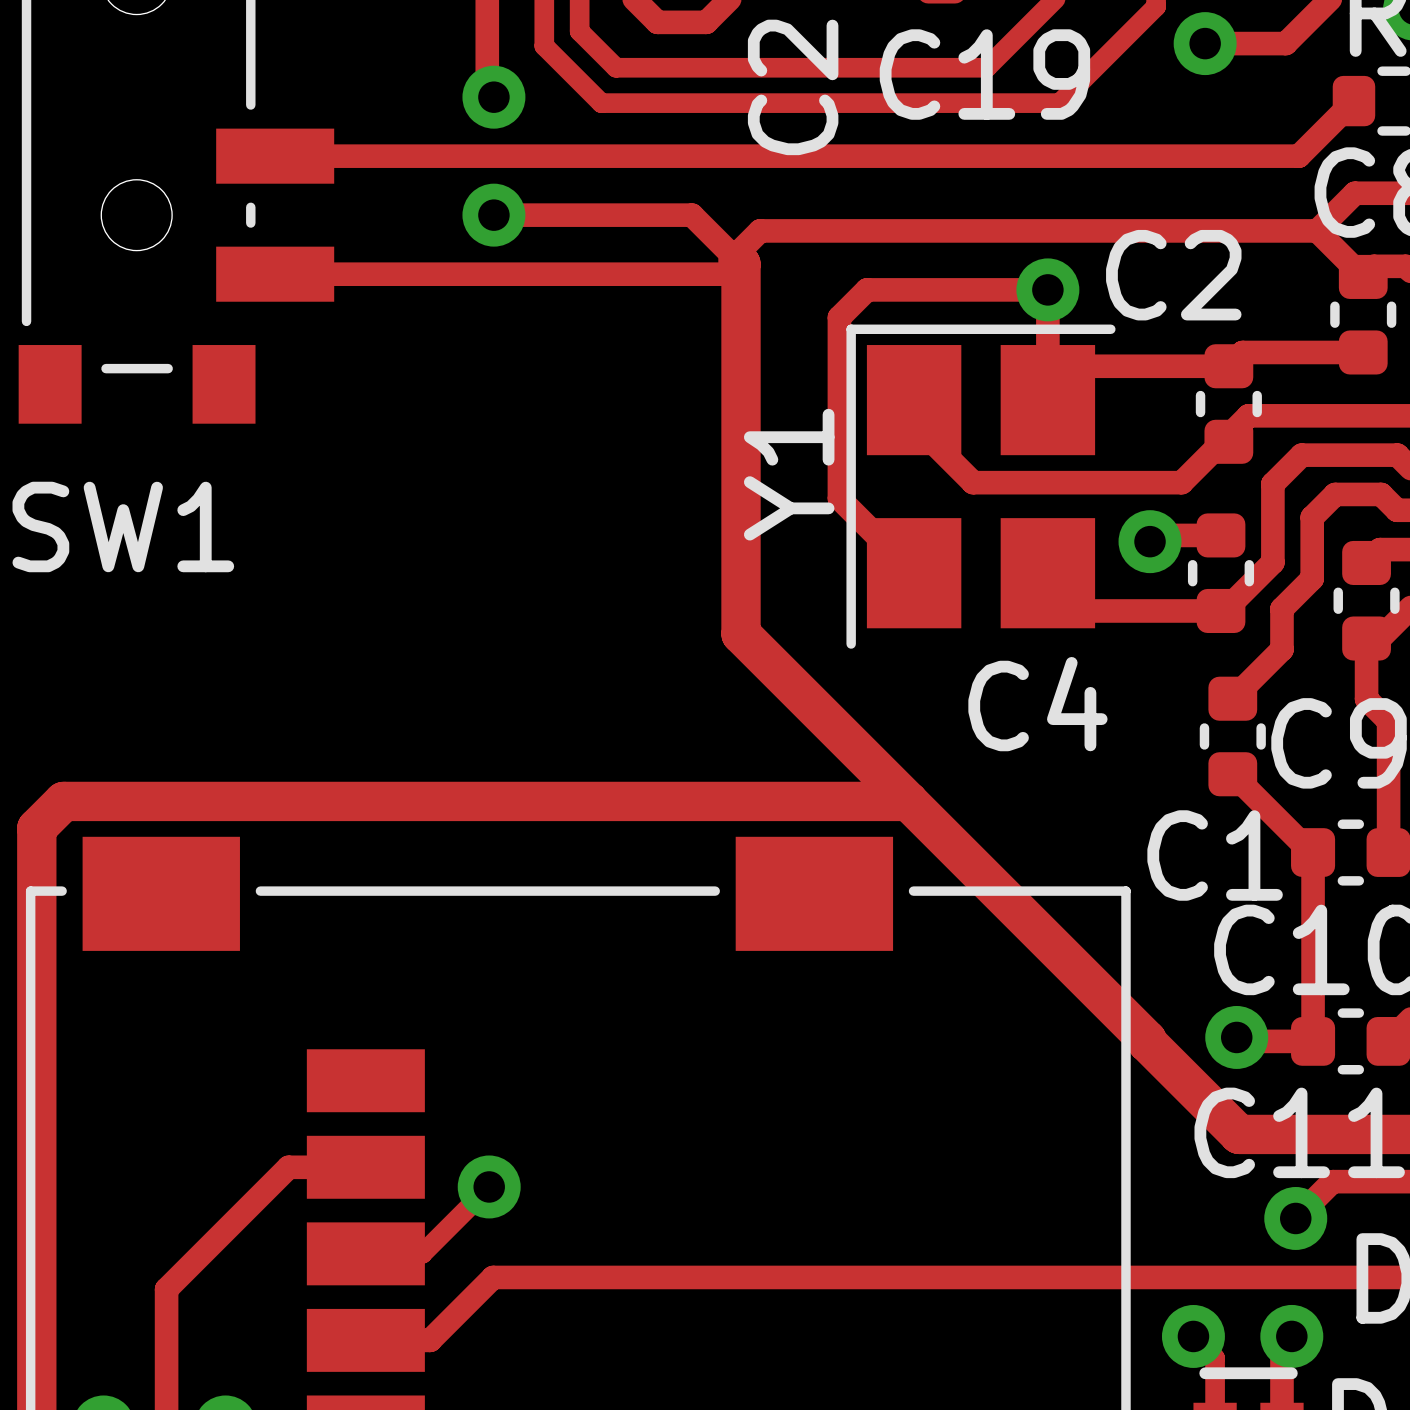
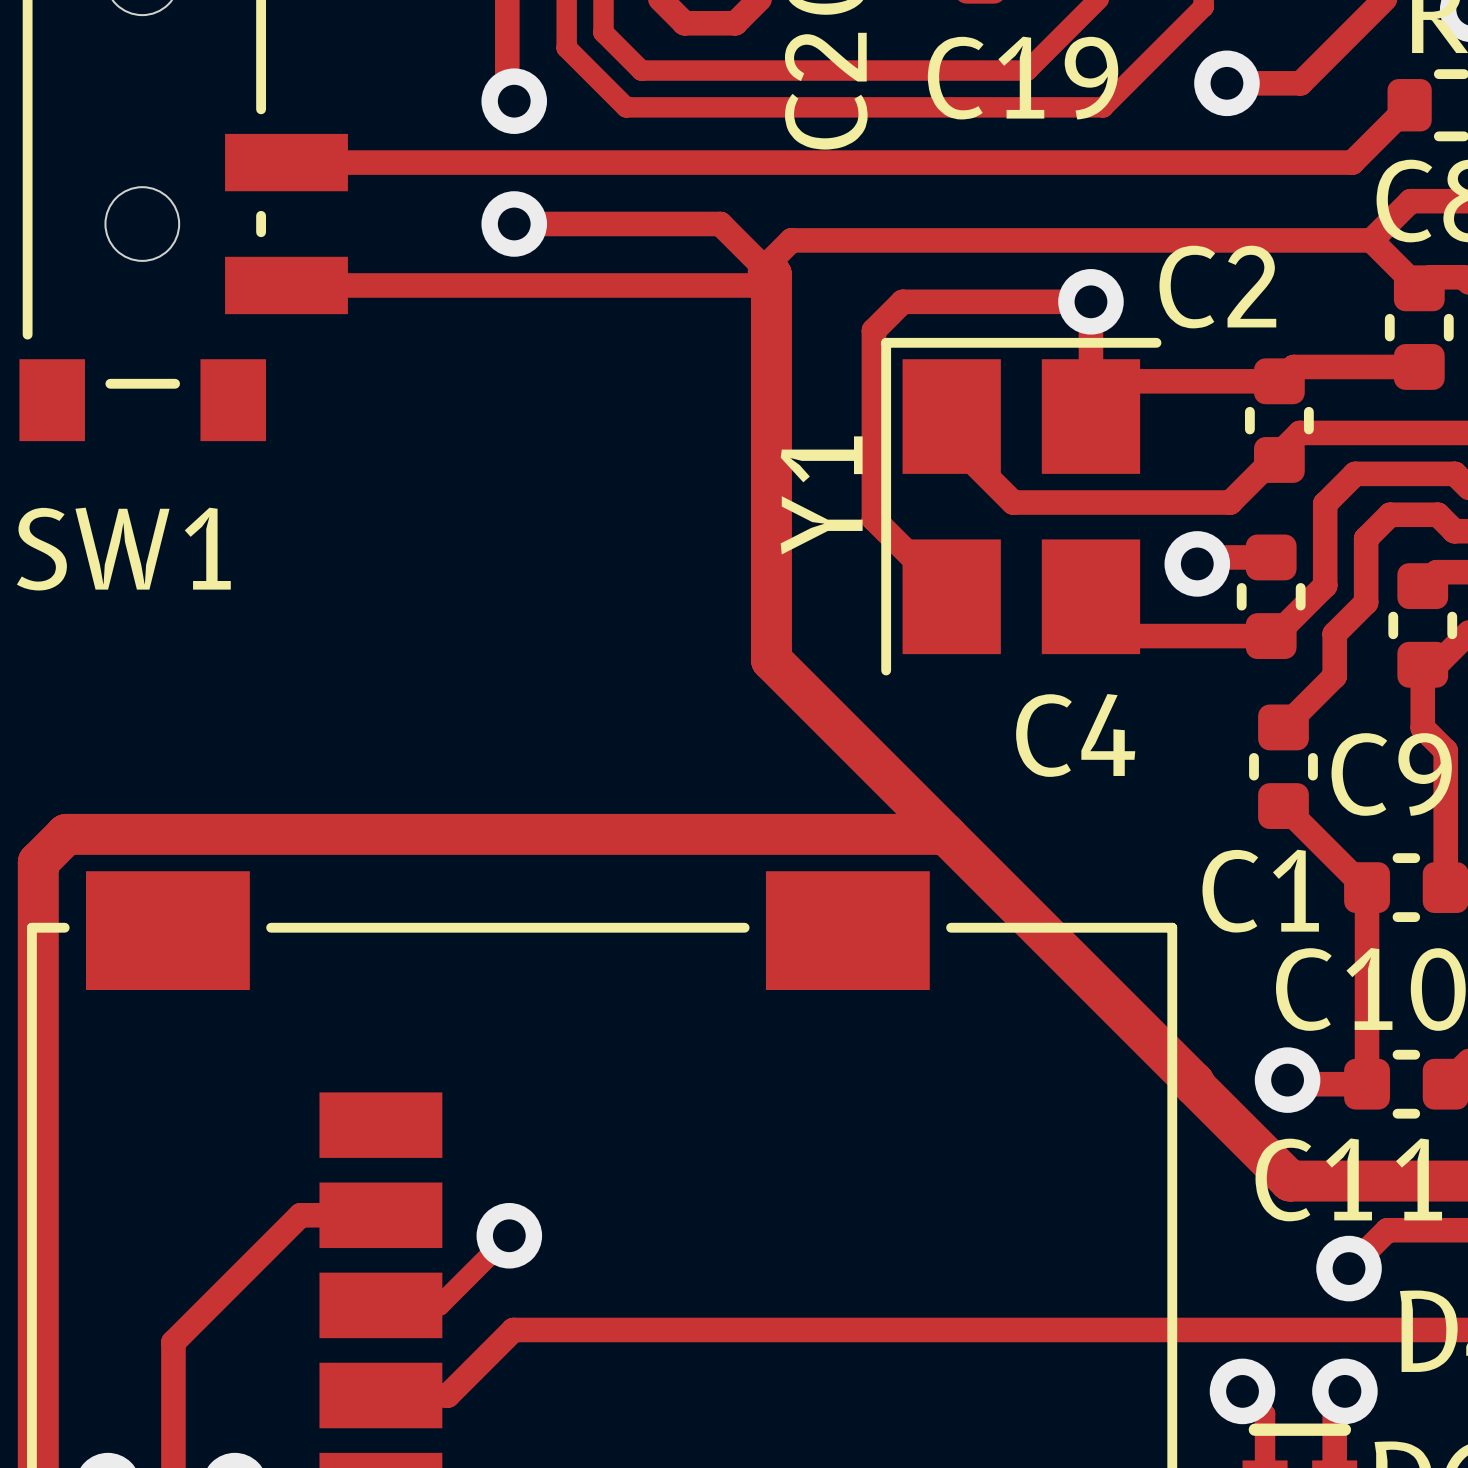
track: (1205, 43) (1285, 43) -> (1226, 83) (1300, 83) (1338, 45)
via position: (1205, 43) -> (1226, 83)

